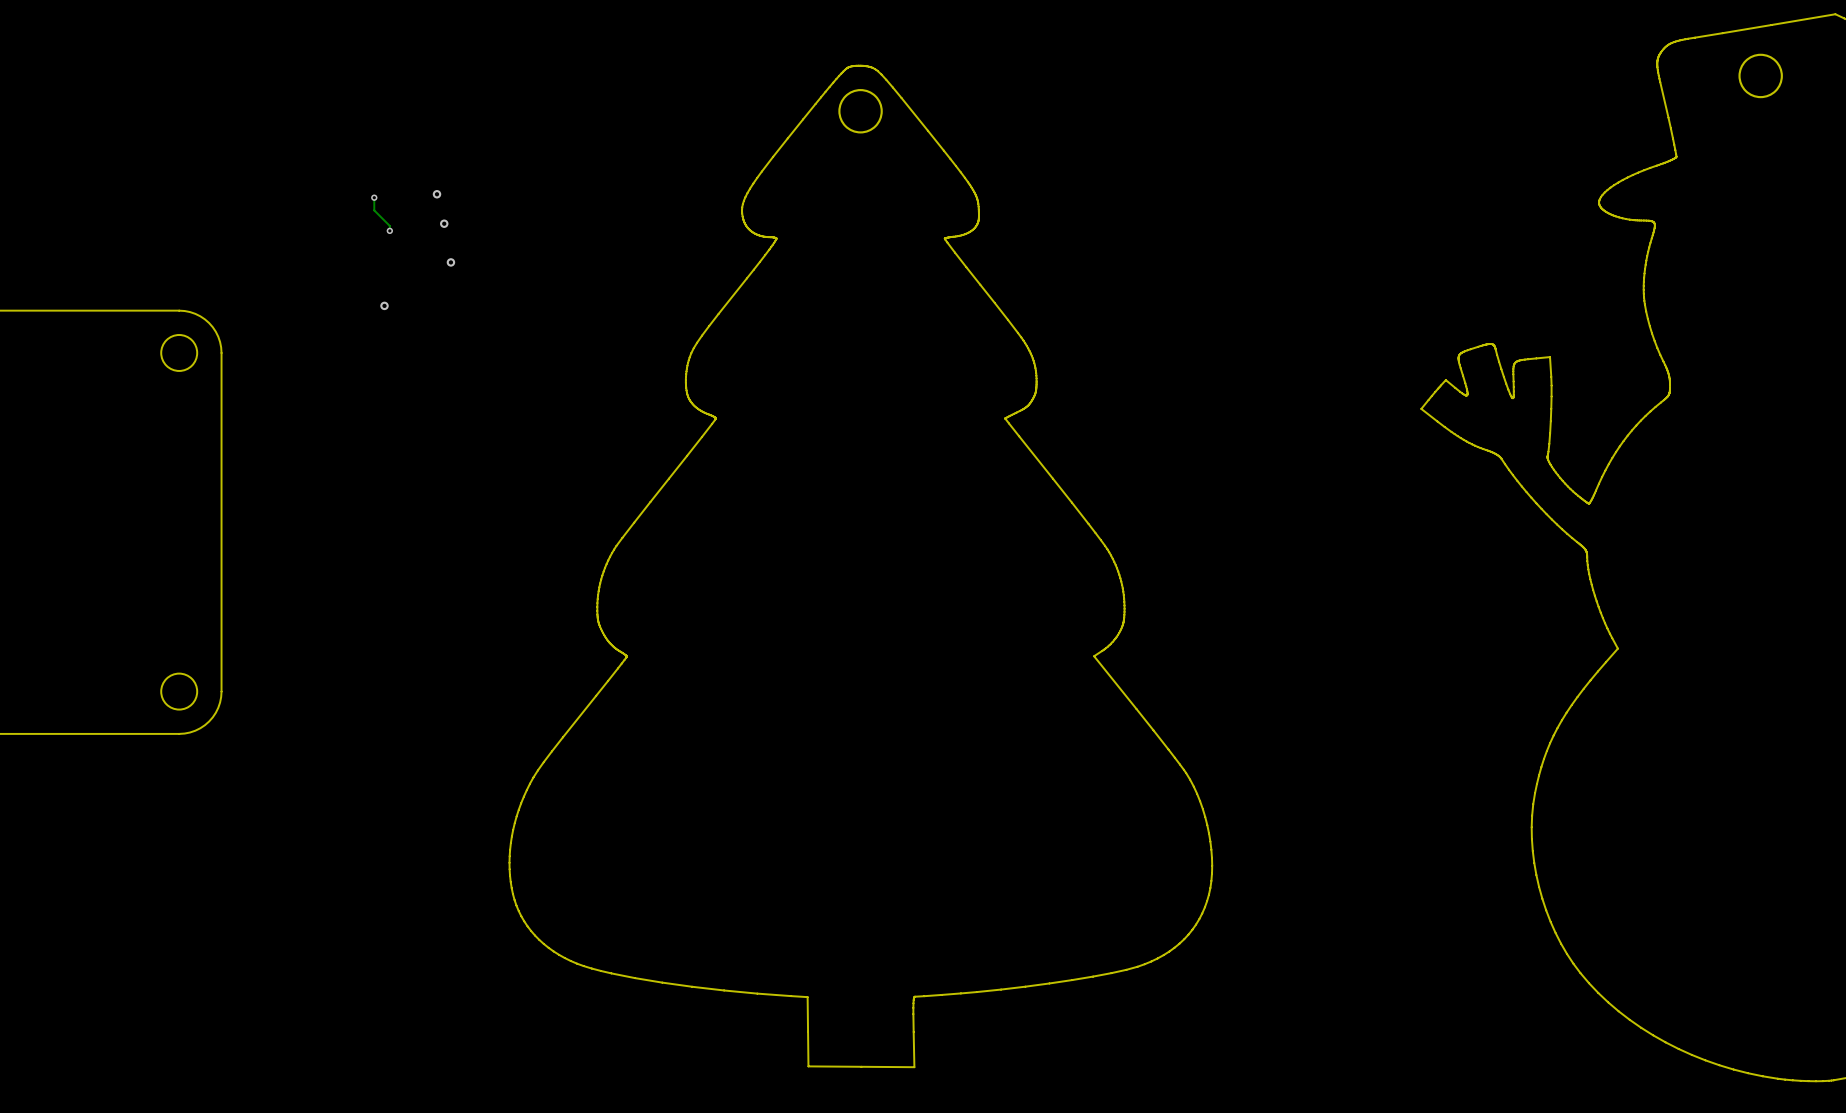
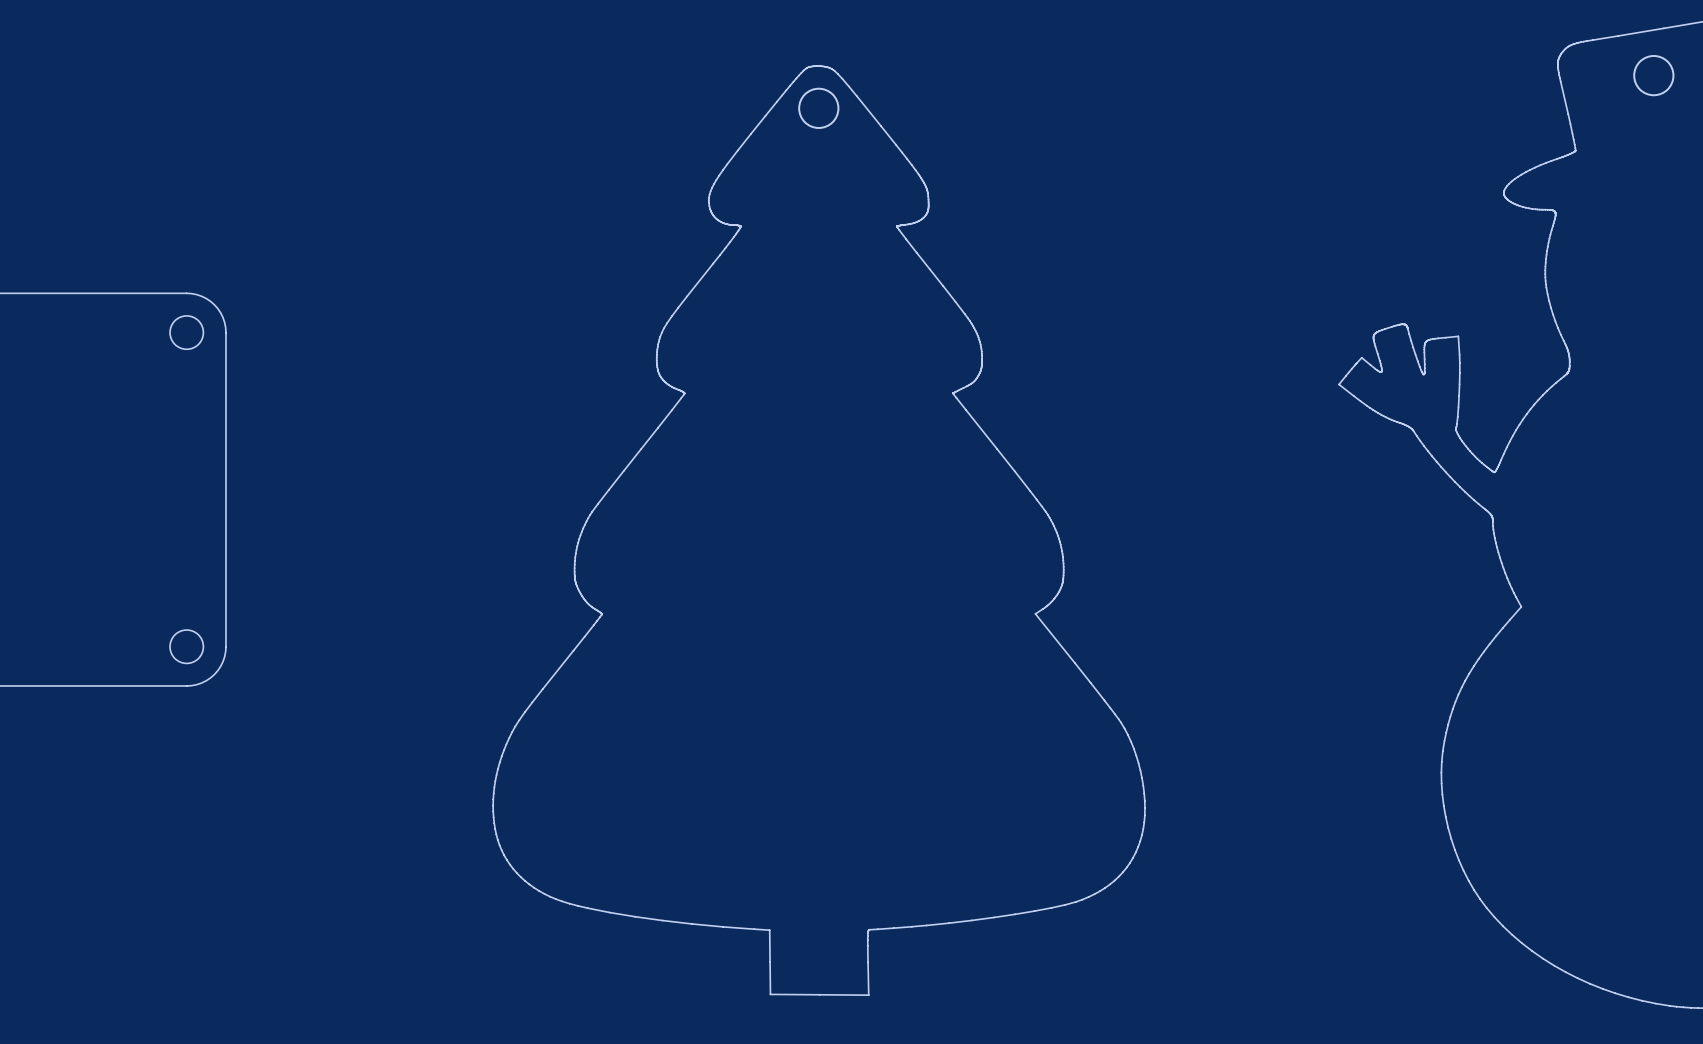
via: (437, 194) -> none
track: (374, 197) (374, 210) (389, 225) (389, 230) -> none
via: (374, 197) -> none
via: (444, 223) -> none
via: (389, 230) -> none
via: (450, 262) -> none
via: (384, 305) -> none

